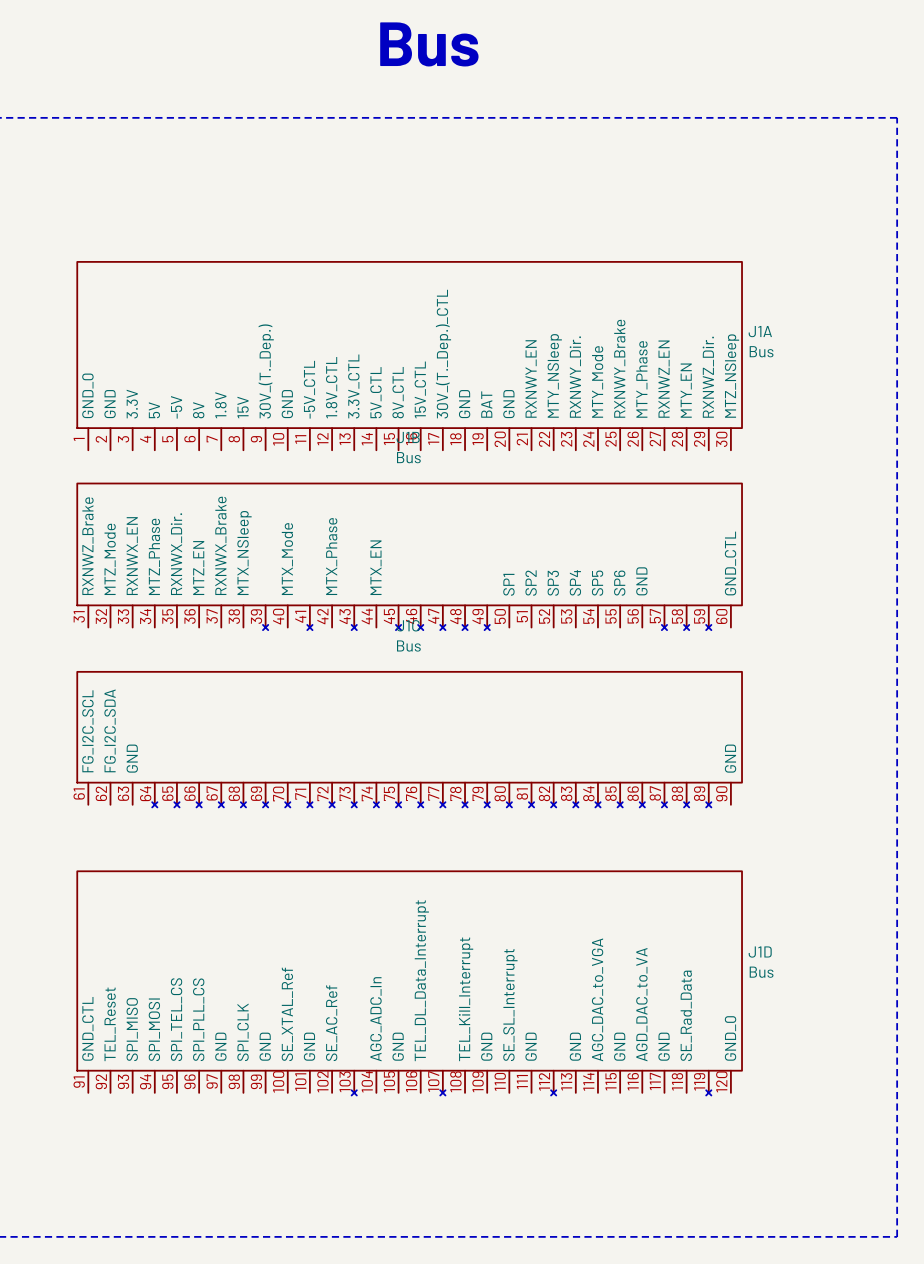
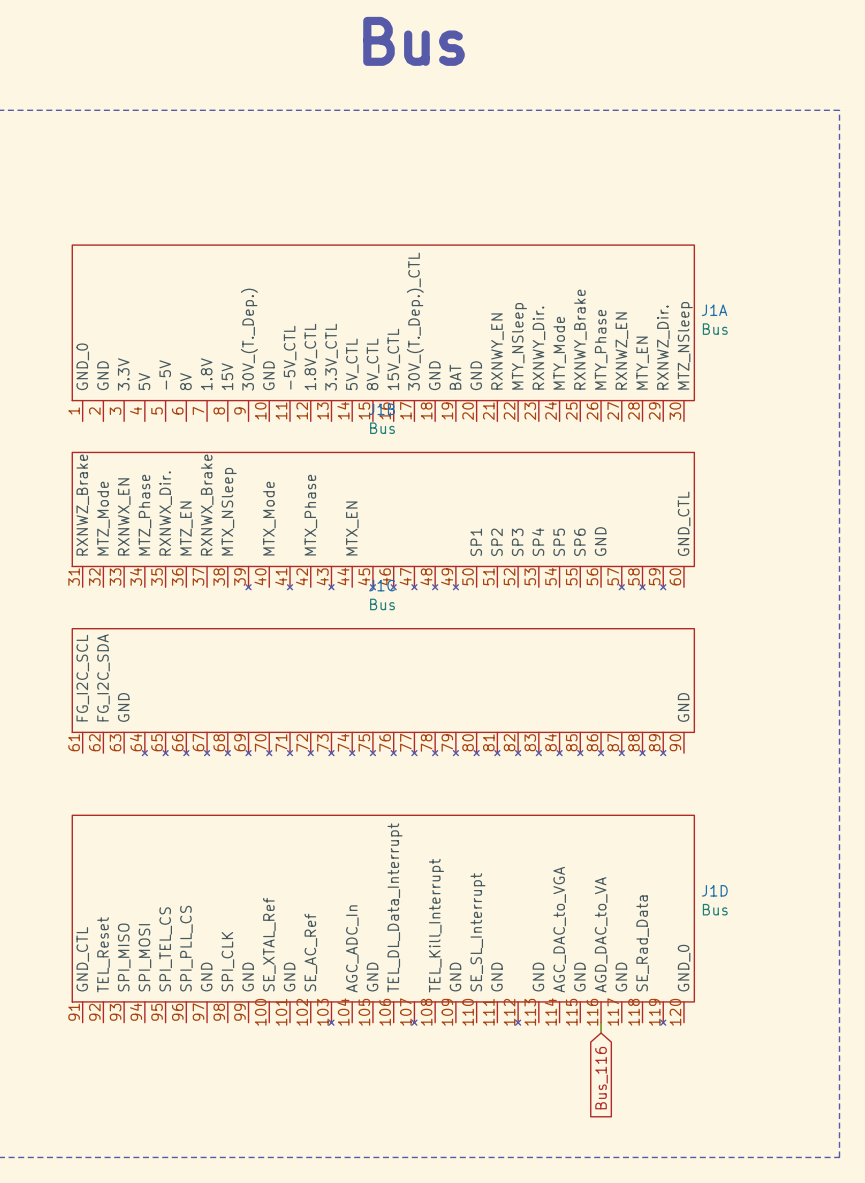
wire: none -> (601, 1022) (601, 1033)
global label: none -> Bus_116 (601, 1078)

